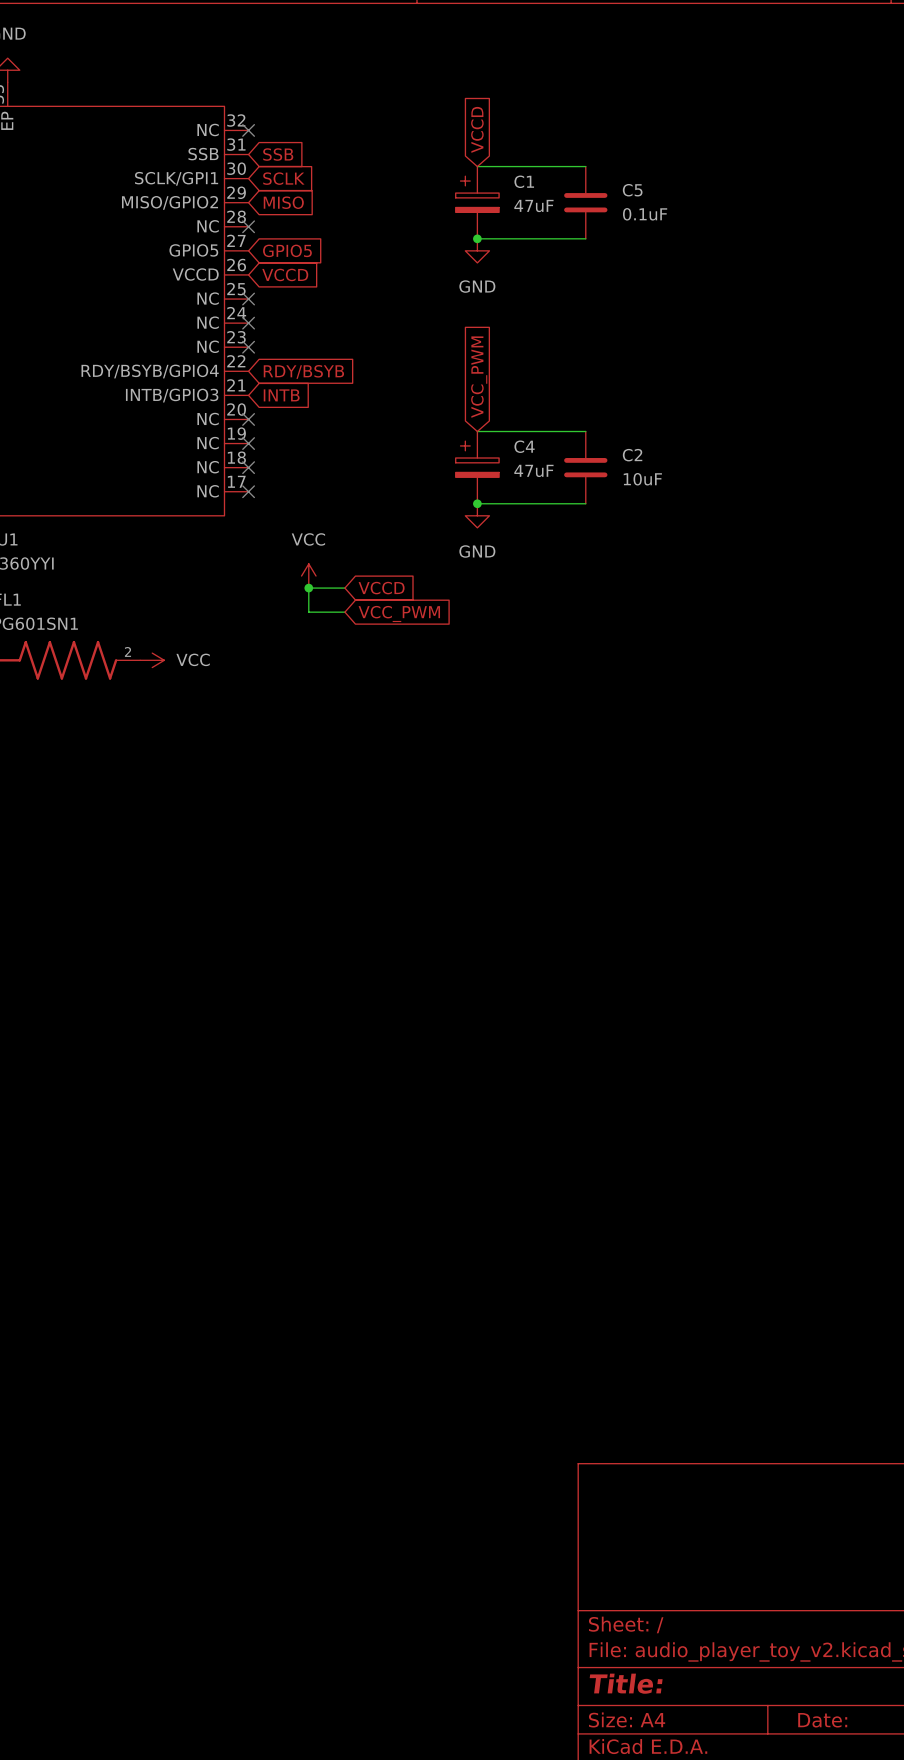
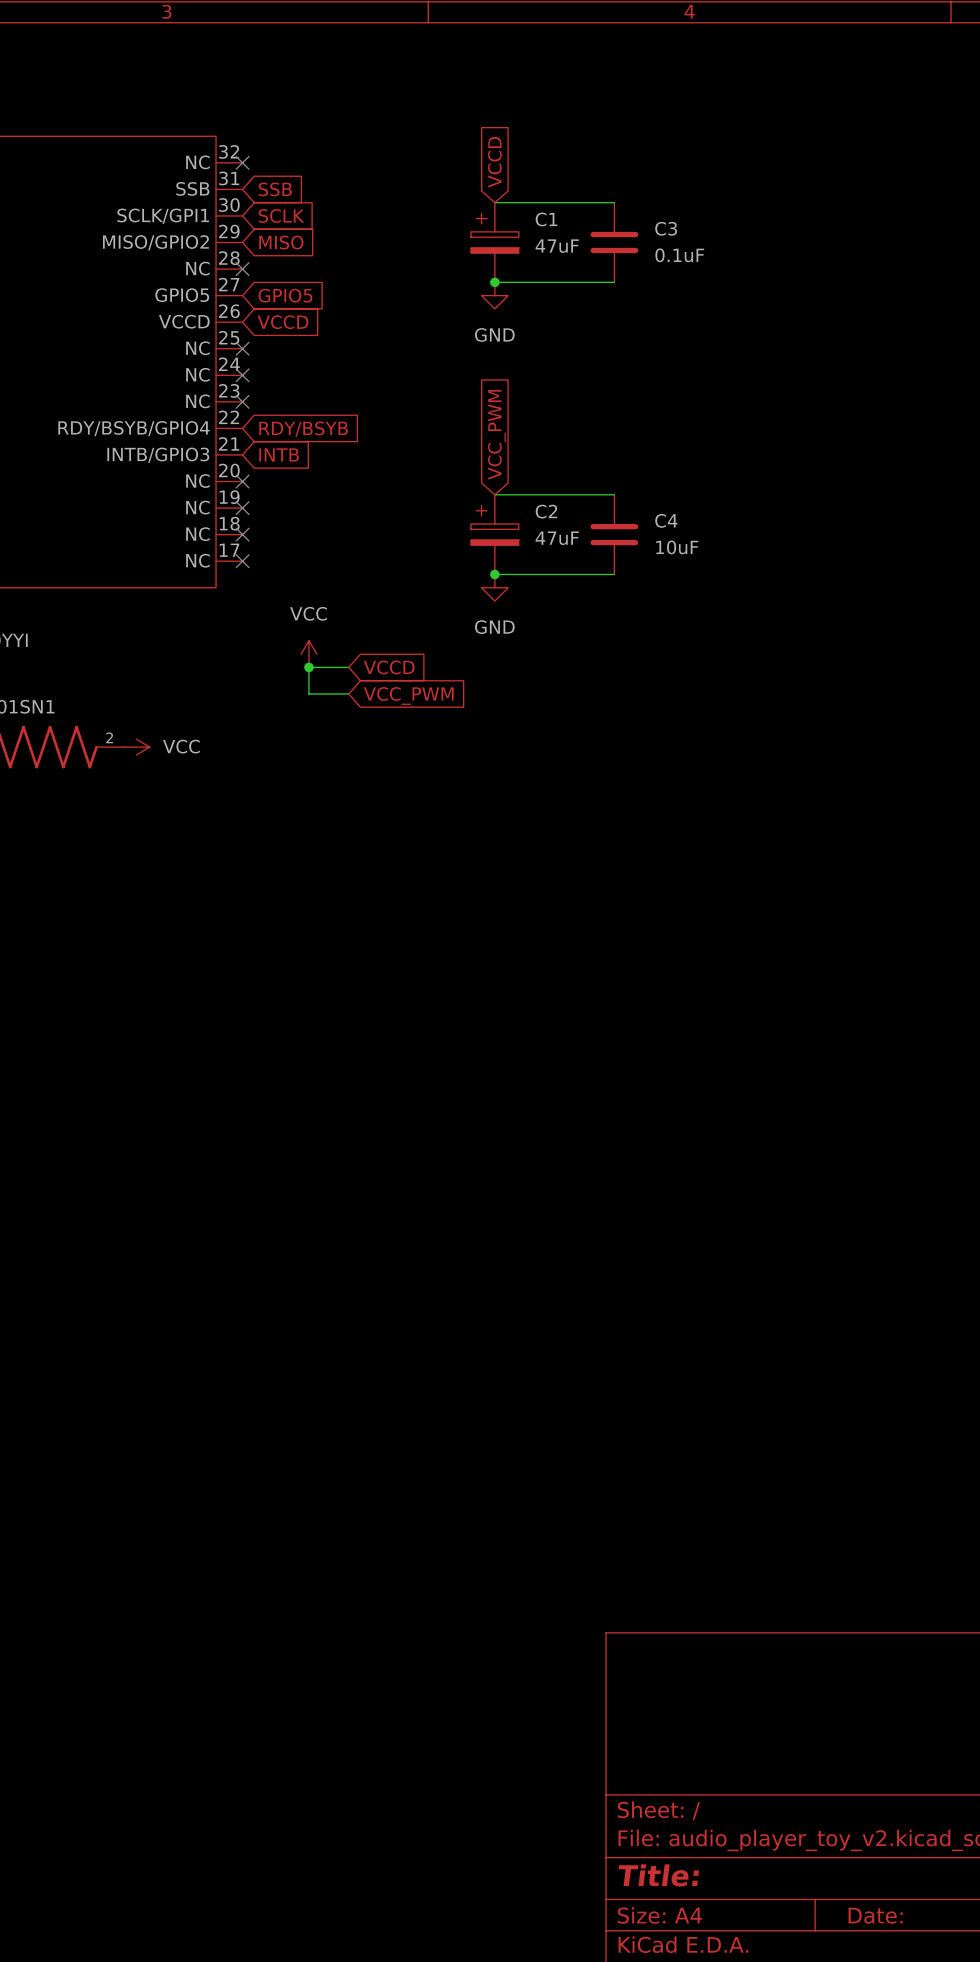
C5 name: C5 (632, 190) -> C3 (666, 228)
C4 name: C4 (524, 446) -> C2 (546, 511)
C2 name: C2 (632, 455) -> C4 (666, 520)

